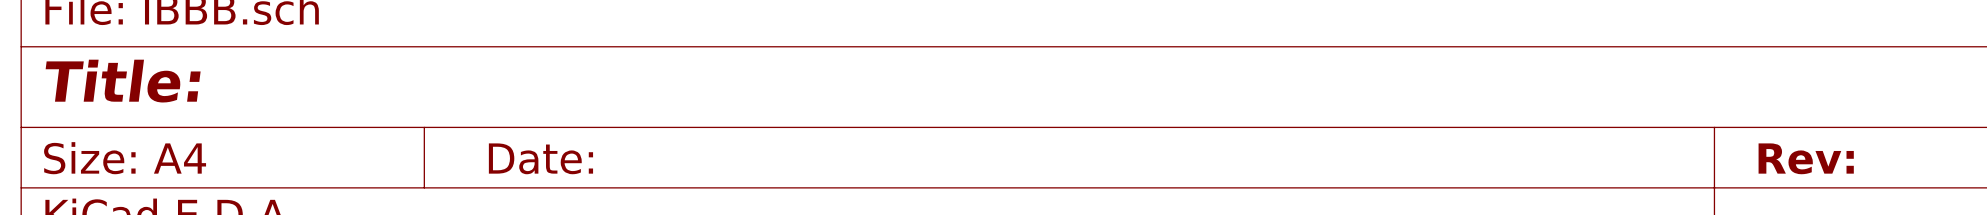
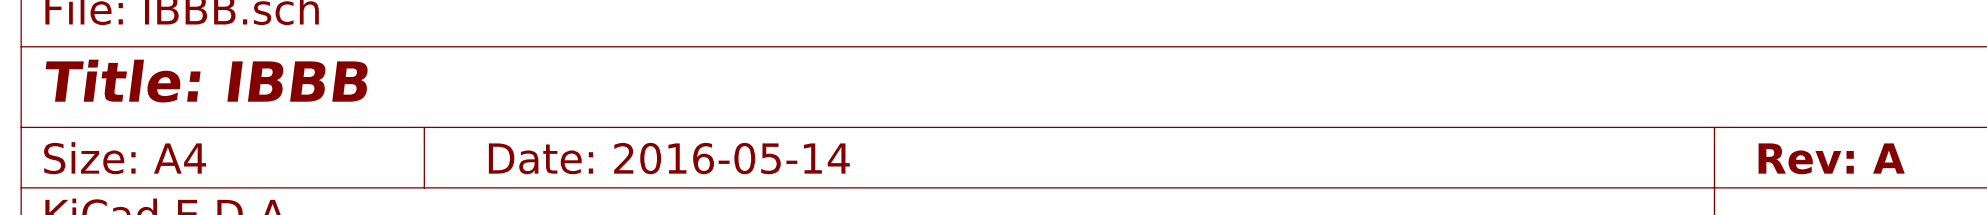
title block: Title: (123, 81) -> Title: IBBB (206, 81)
title block: Date: (540, 158) -> Date: 2016-05-14 (669, 158)
title block: Rev: (1806, 158) -> Rev: A (1831, 158)

